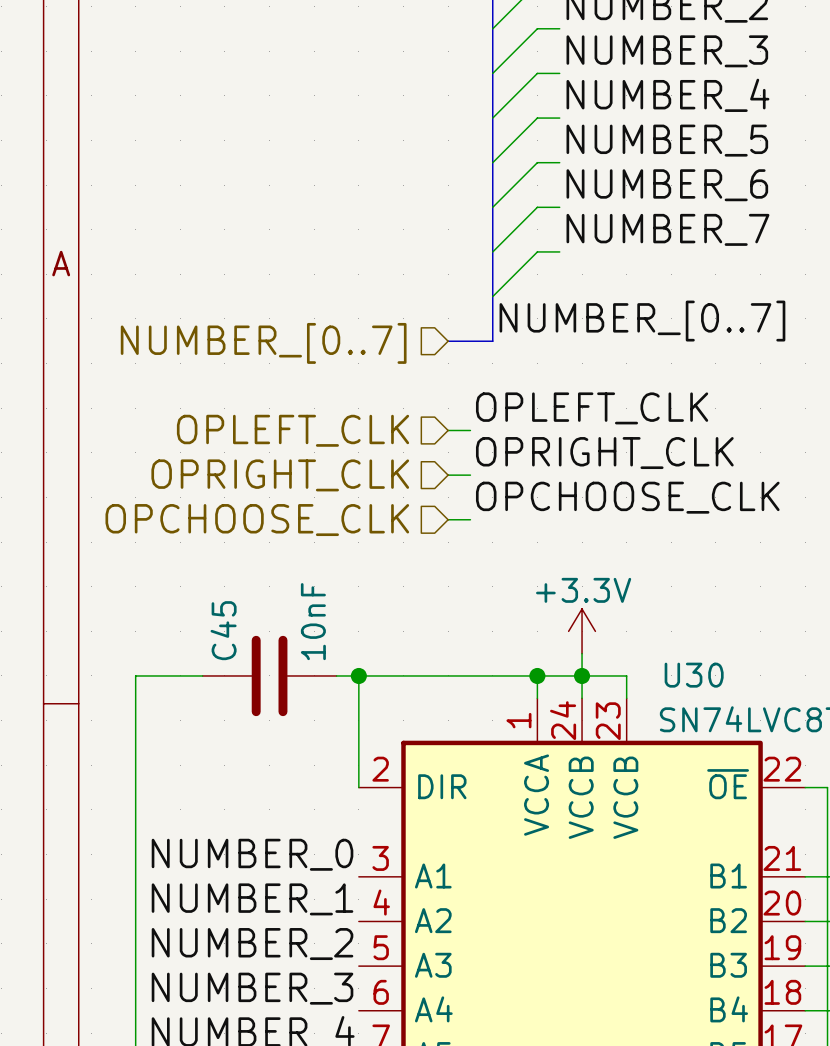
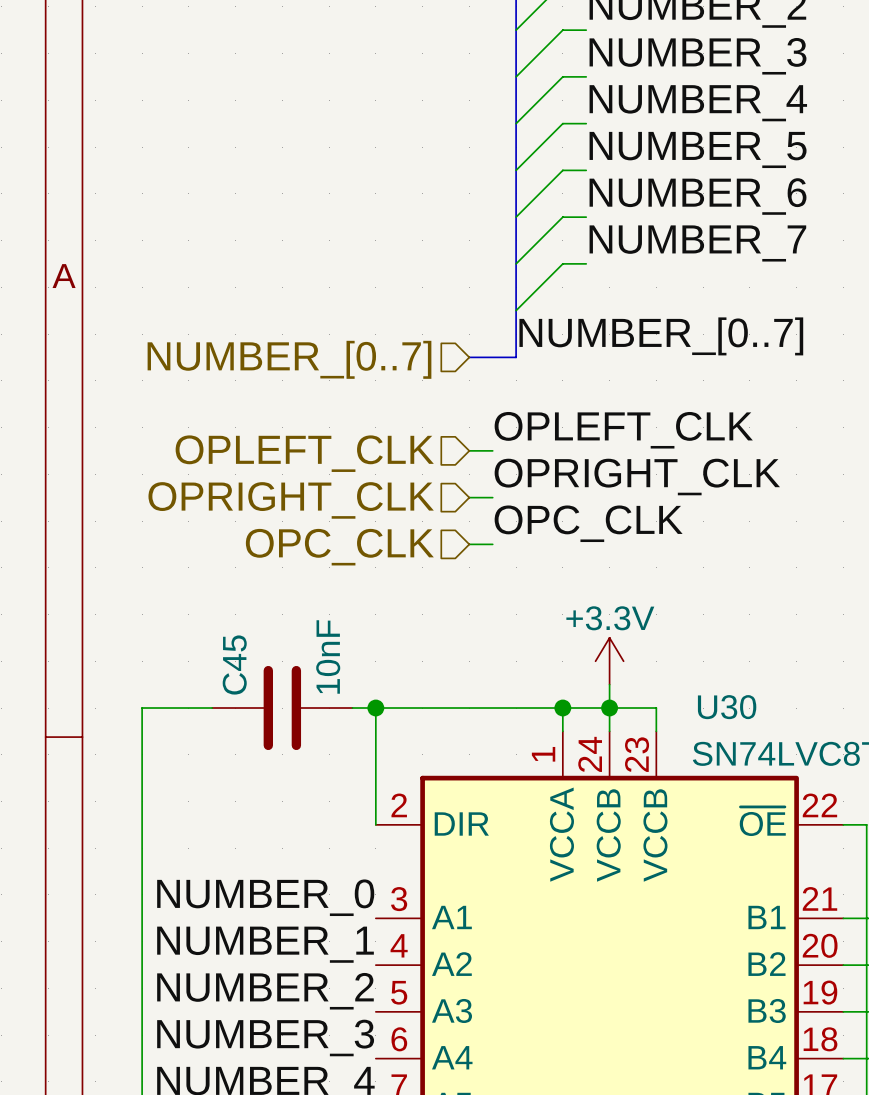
label: OPCHOOSE_CLK (627, 497) -> OPC_CLK (588, 523)
hierarchical label: OPCHOOSE_CLK (257, 520) -> OPC_CLK (339, 547)

